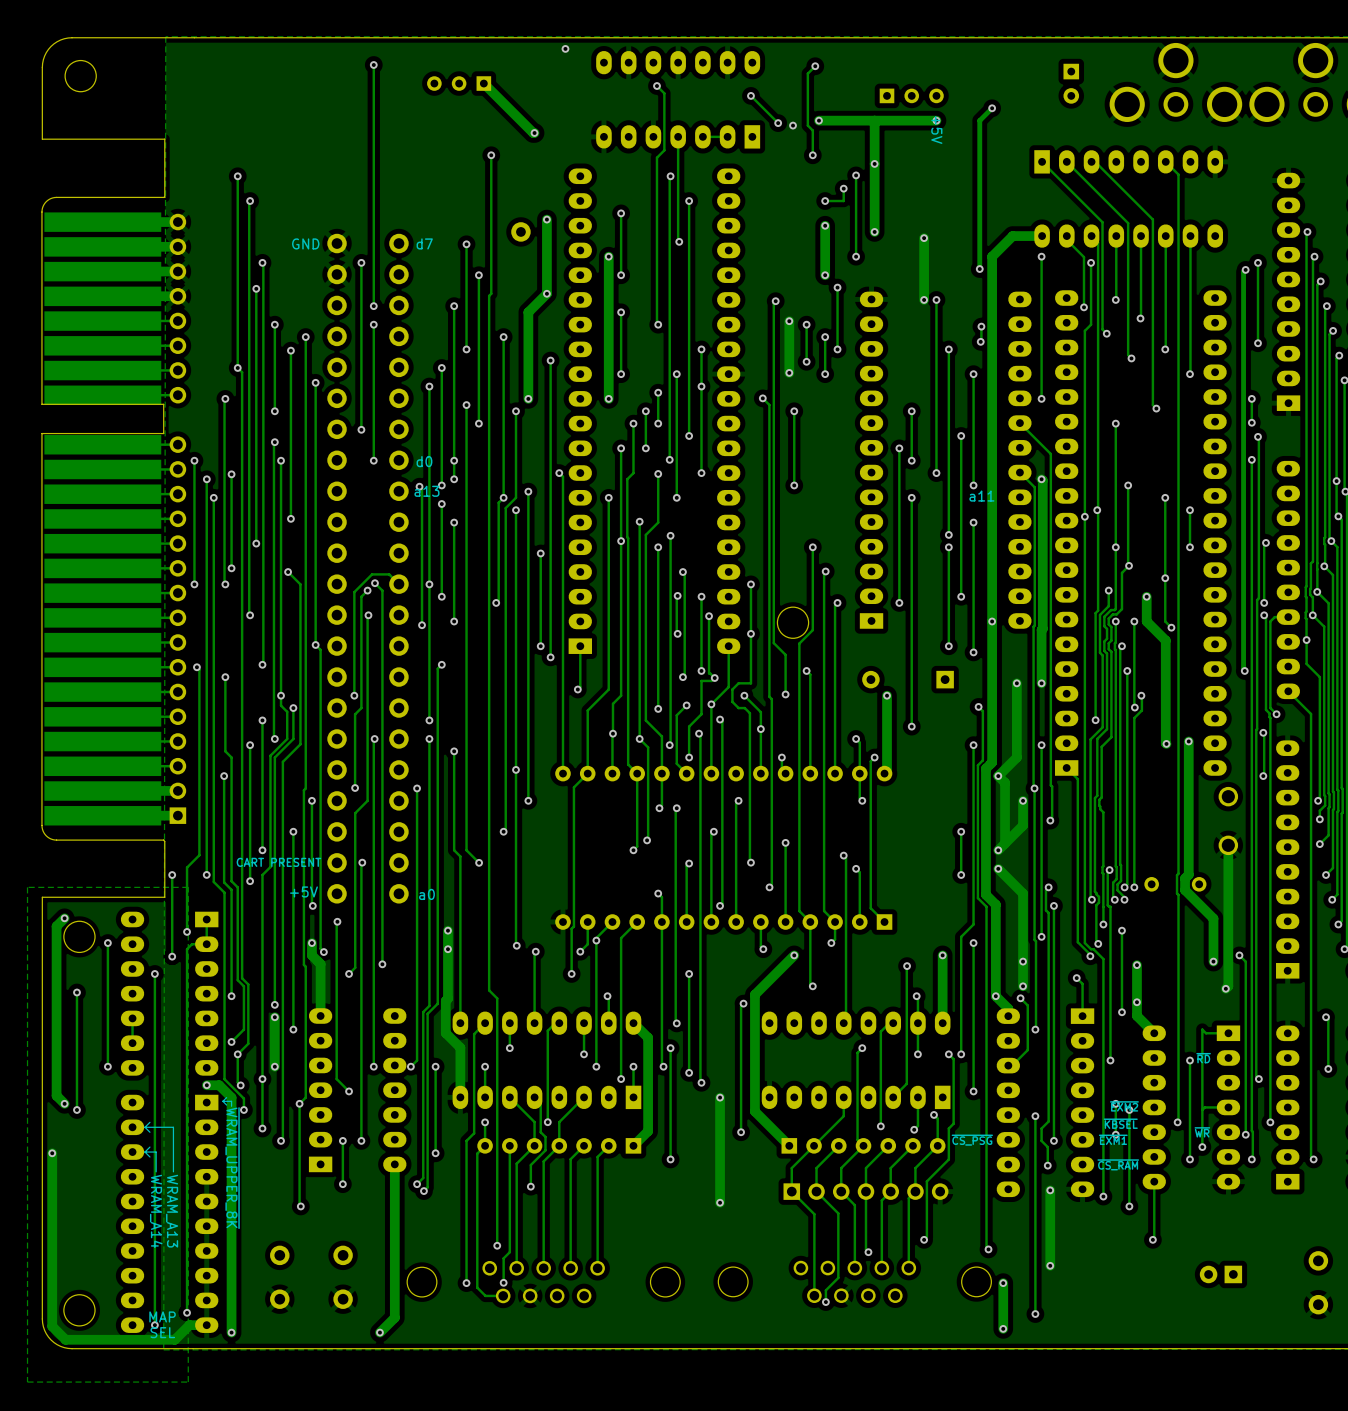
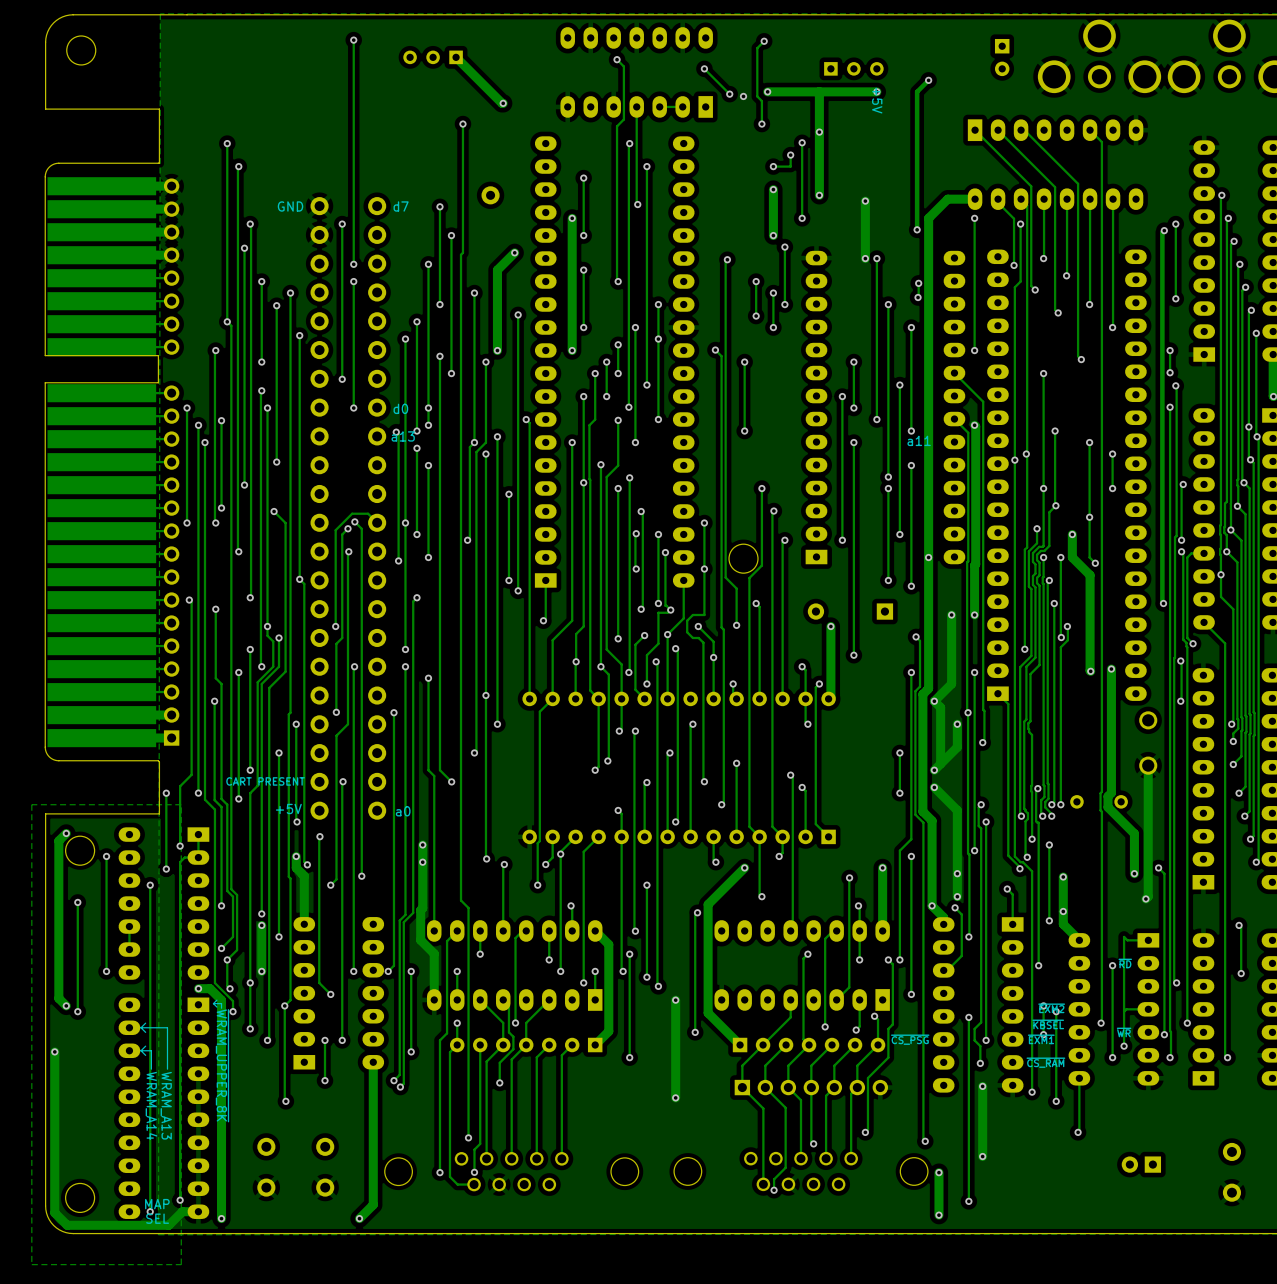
via: (565, 48) -> none
track: (546, 219) (546, 293) -> none
via: (546, 219) -> none
track: (789, 321) (789, 372) -> none
via: (789, 321) -> none
via: (789, 372) -> none

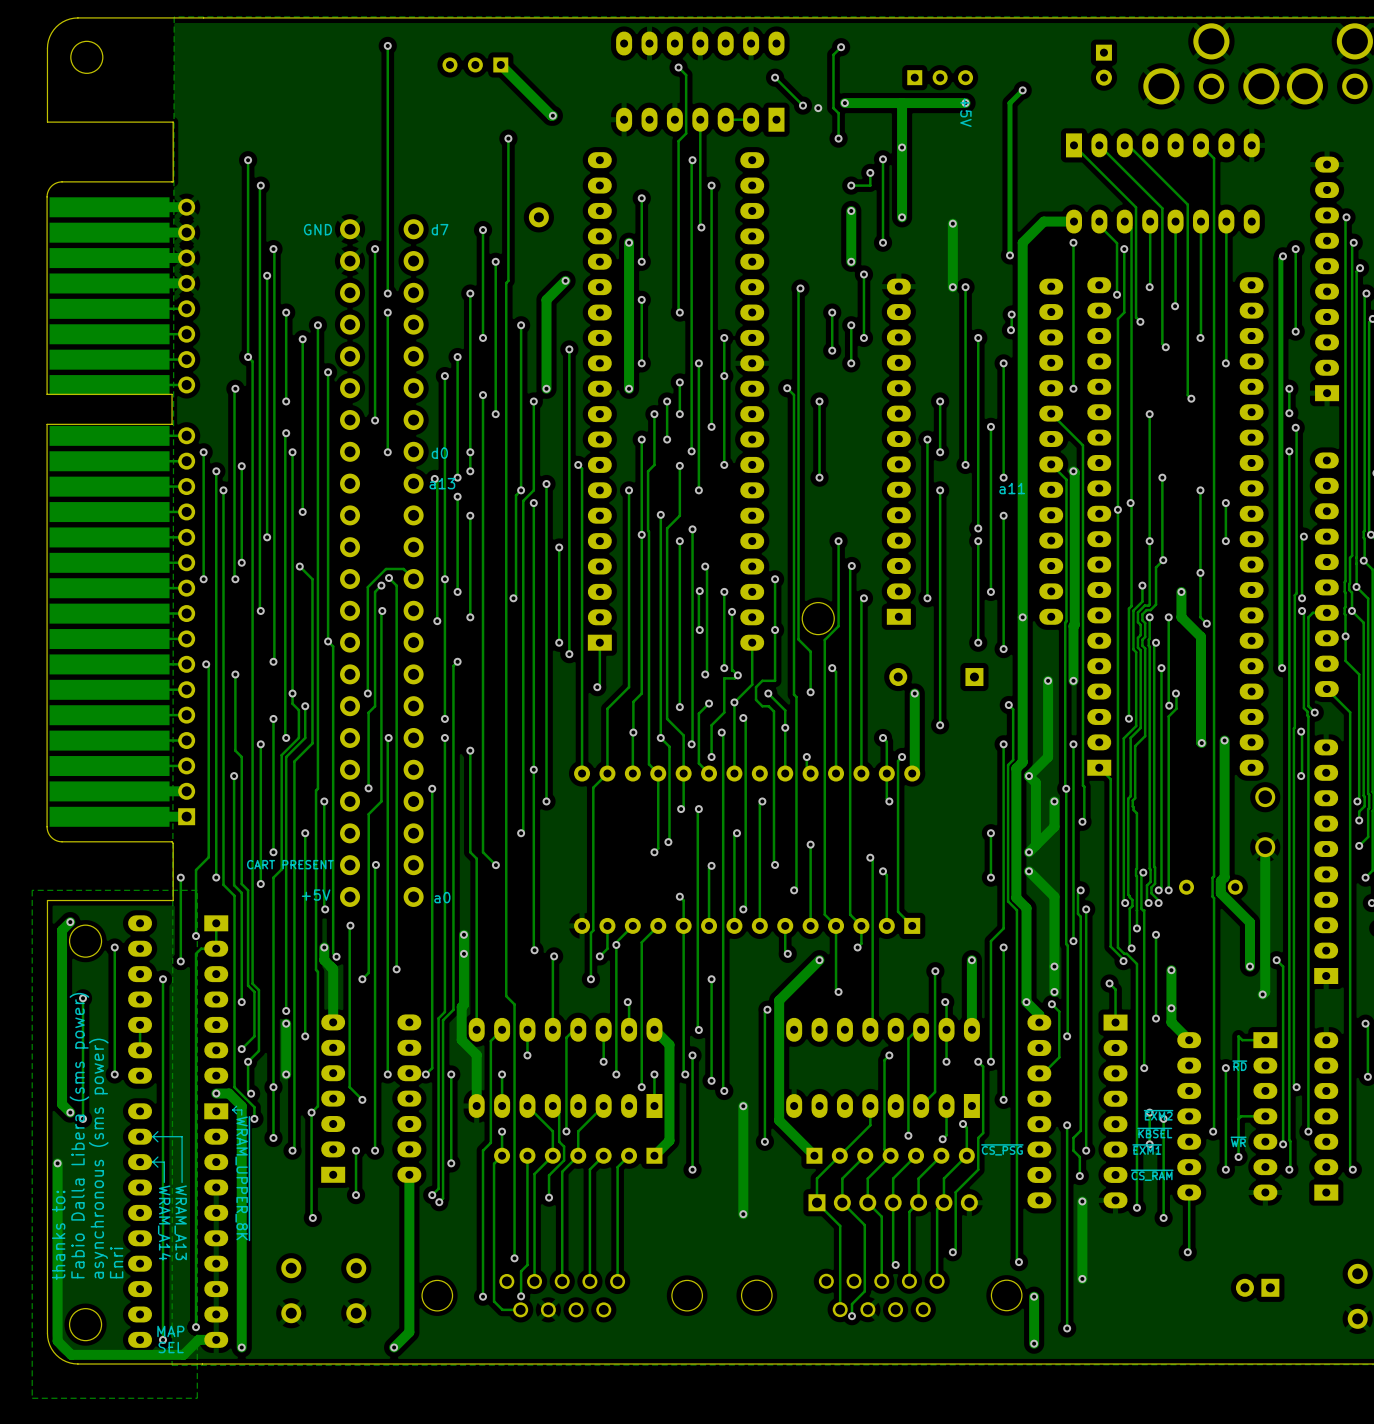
text: none -> Fabio Dalla Libera (sms power) (79, 1135)
text: none -> asynchronous (sms power) (98, 1158)
text: none -> thanks to: (58, 1235)
text: none -> Enri (116, 1262)

